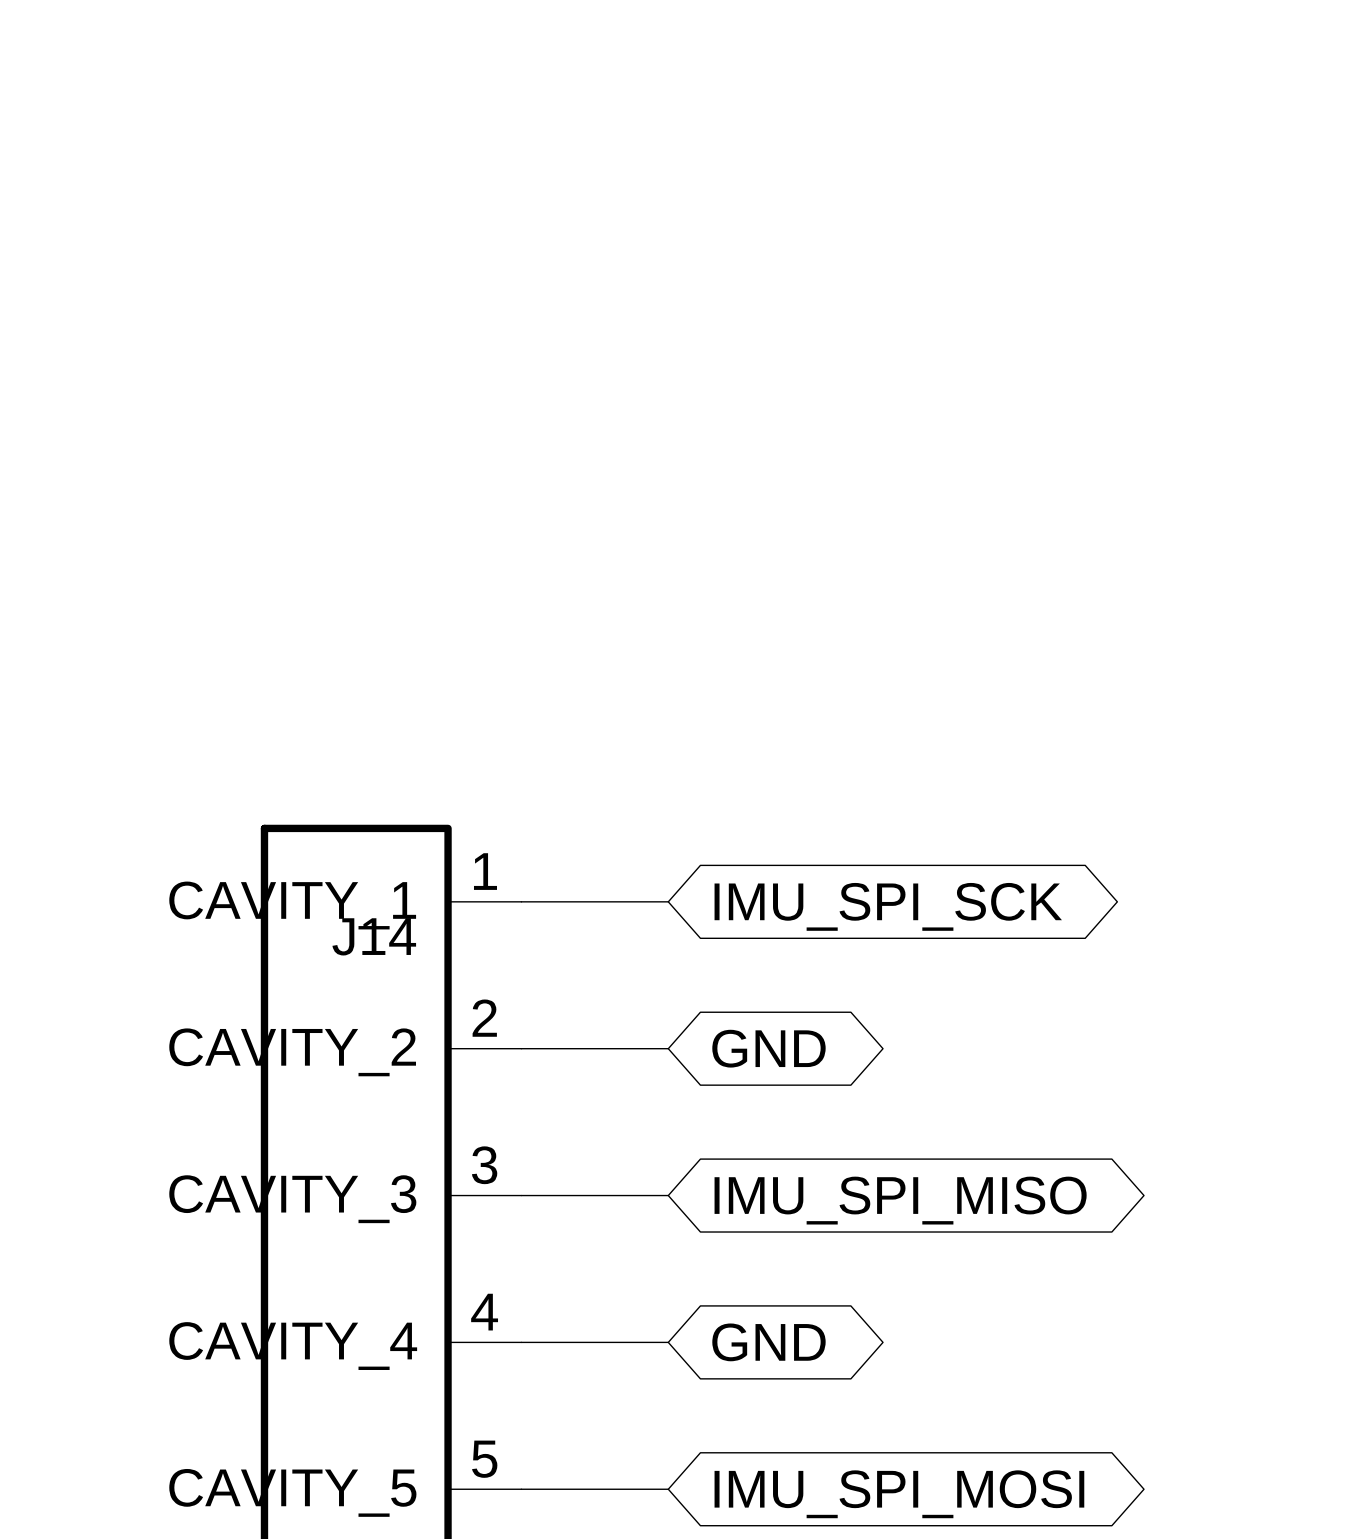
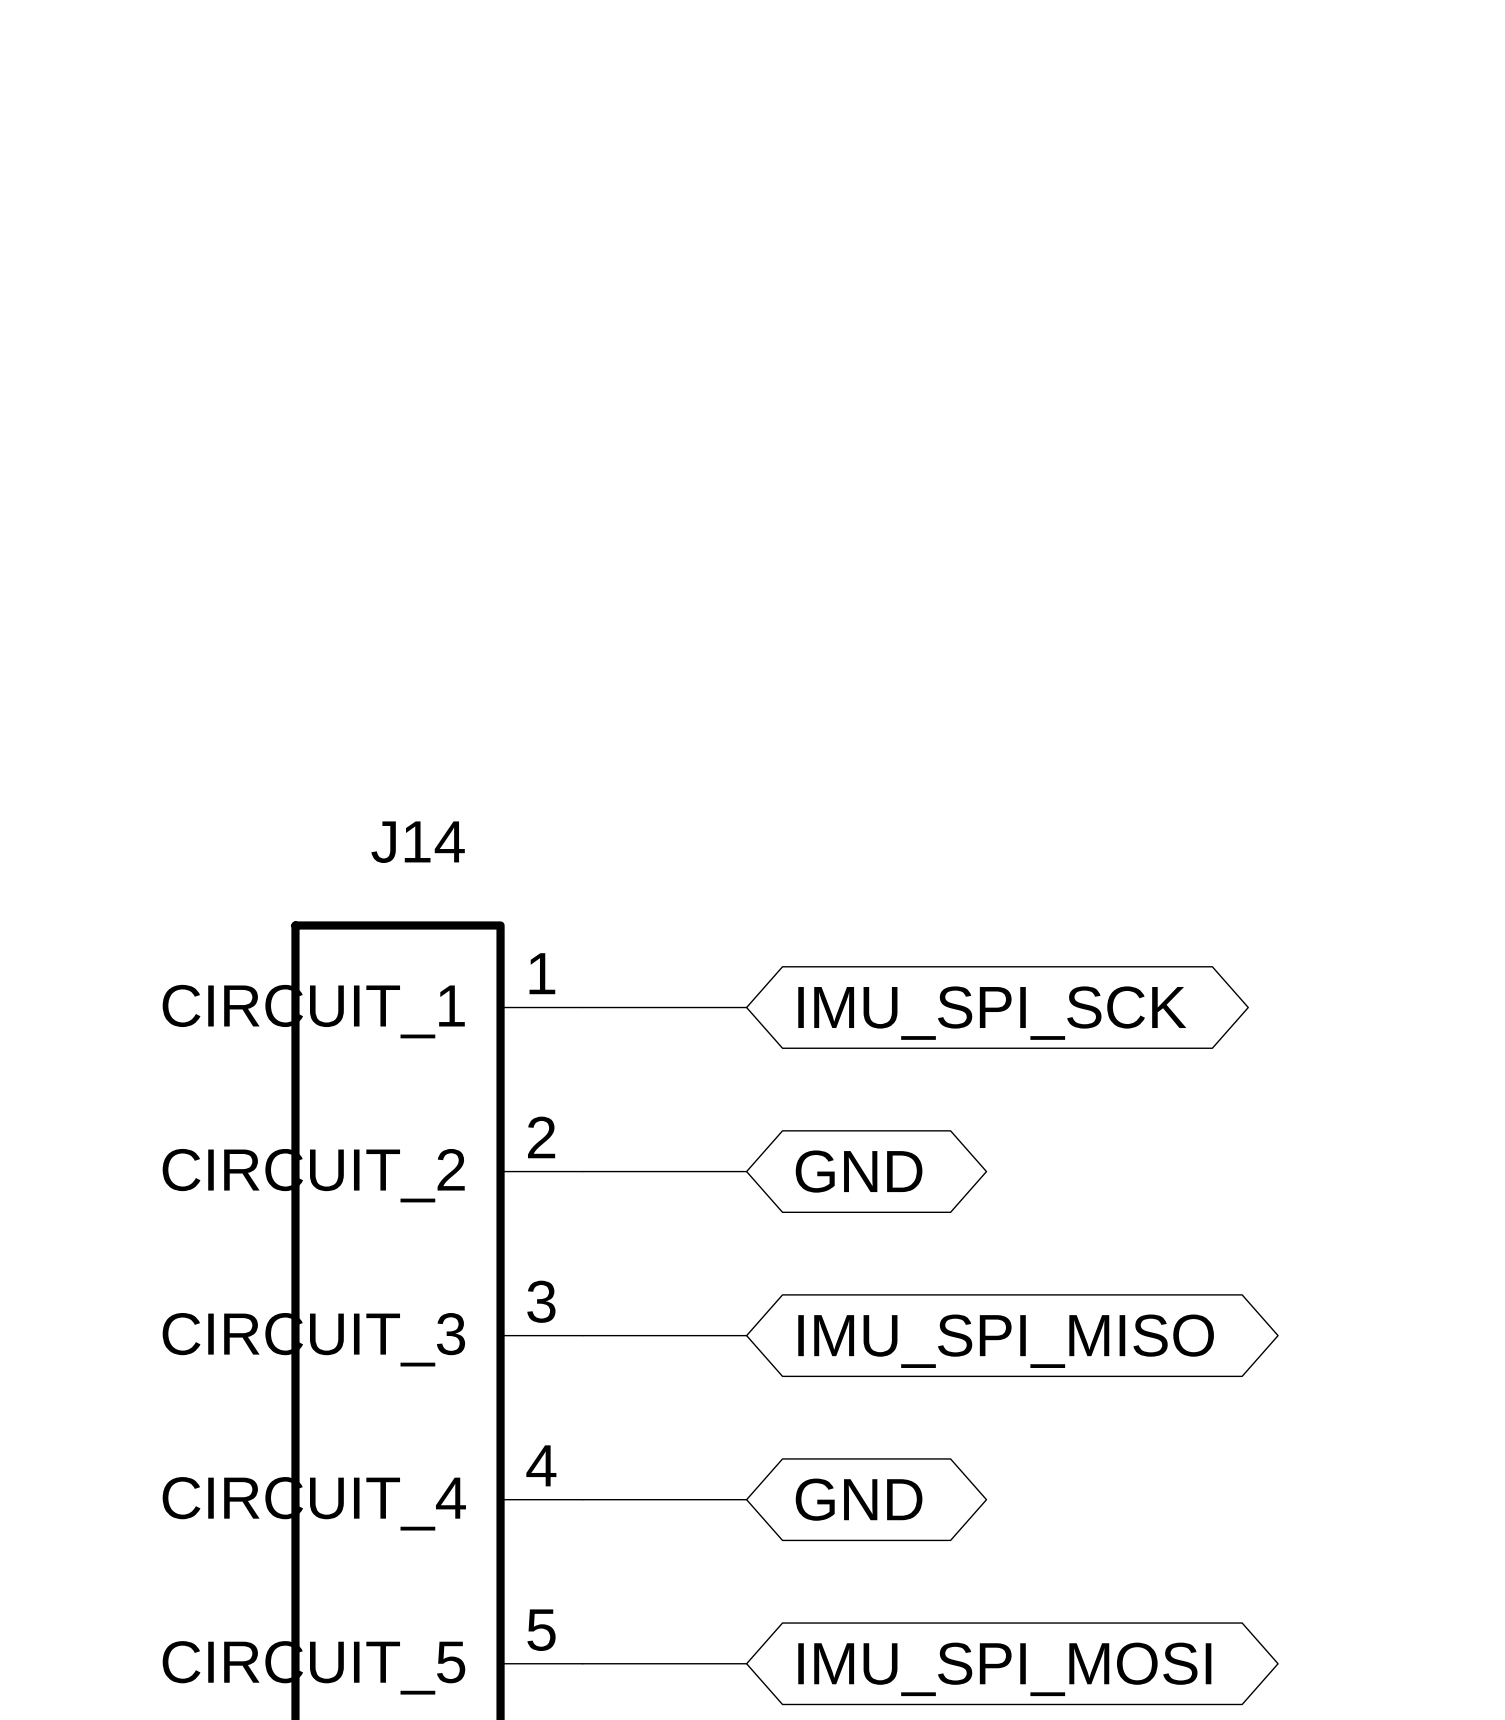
J14 pin name: CAVITY_1 (292, 905) -> CIRCUIT_1 (313, 1011)
J14 name position: J14 (374, 936) -> J14 (418, 842)
J14 pin name: CAVITY_2 (292, 1052) -> CIRCUIT_2 (313, 1175)
J14 pin name: CAVITY_3 (292, 1199) -> CIRCUIT_3 (313, 1339)
J14 pin name: CAVITY_4 (293, 1346) -> CIRCUIT_4 (314, 1503)
J14 pin name: CAVITY_5 (292, 1492) -> CIRCUIT_5 (313, 1667)

